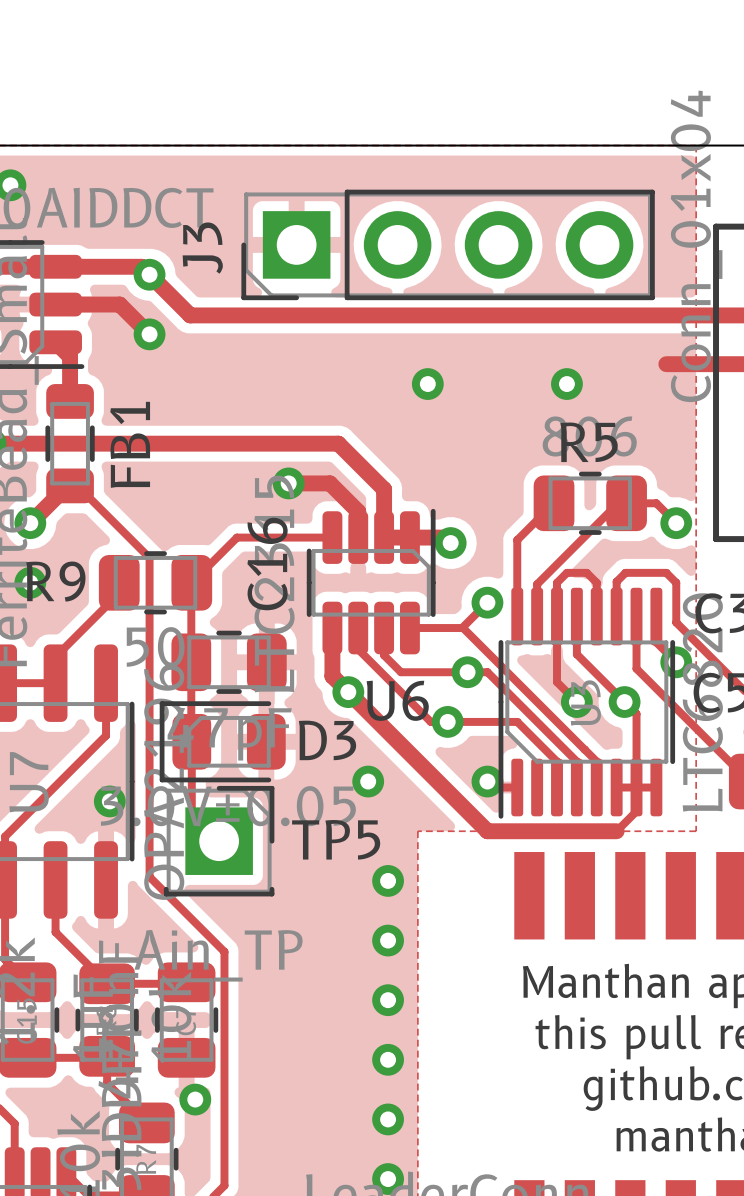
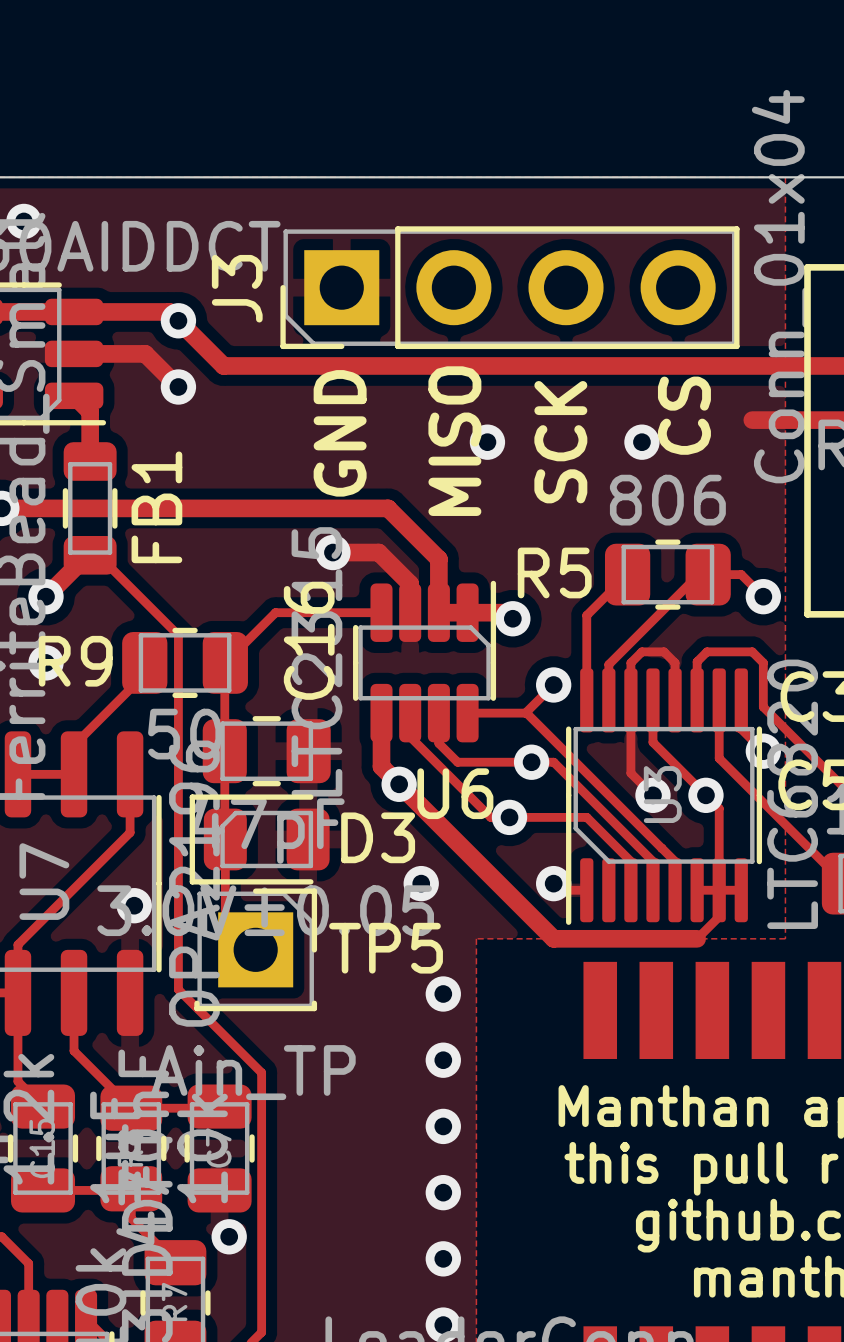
text: none -> CS (684, 415)
text: none -> GND (340, 433)
text: none -> MISO (454, 441)
text: none -> SCK (560, 442)
R5 name position: R5 (589, 442) -> R5 (554, 572)

